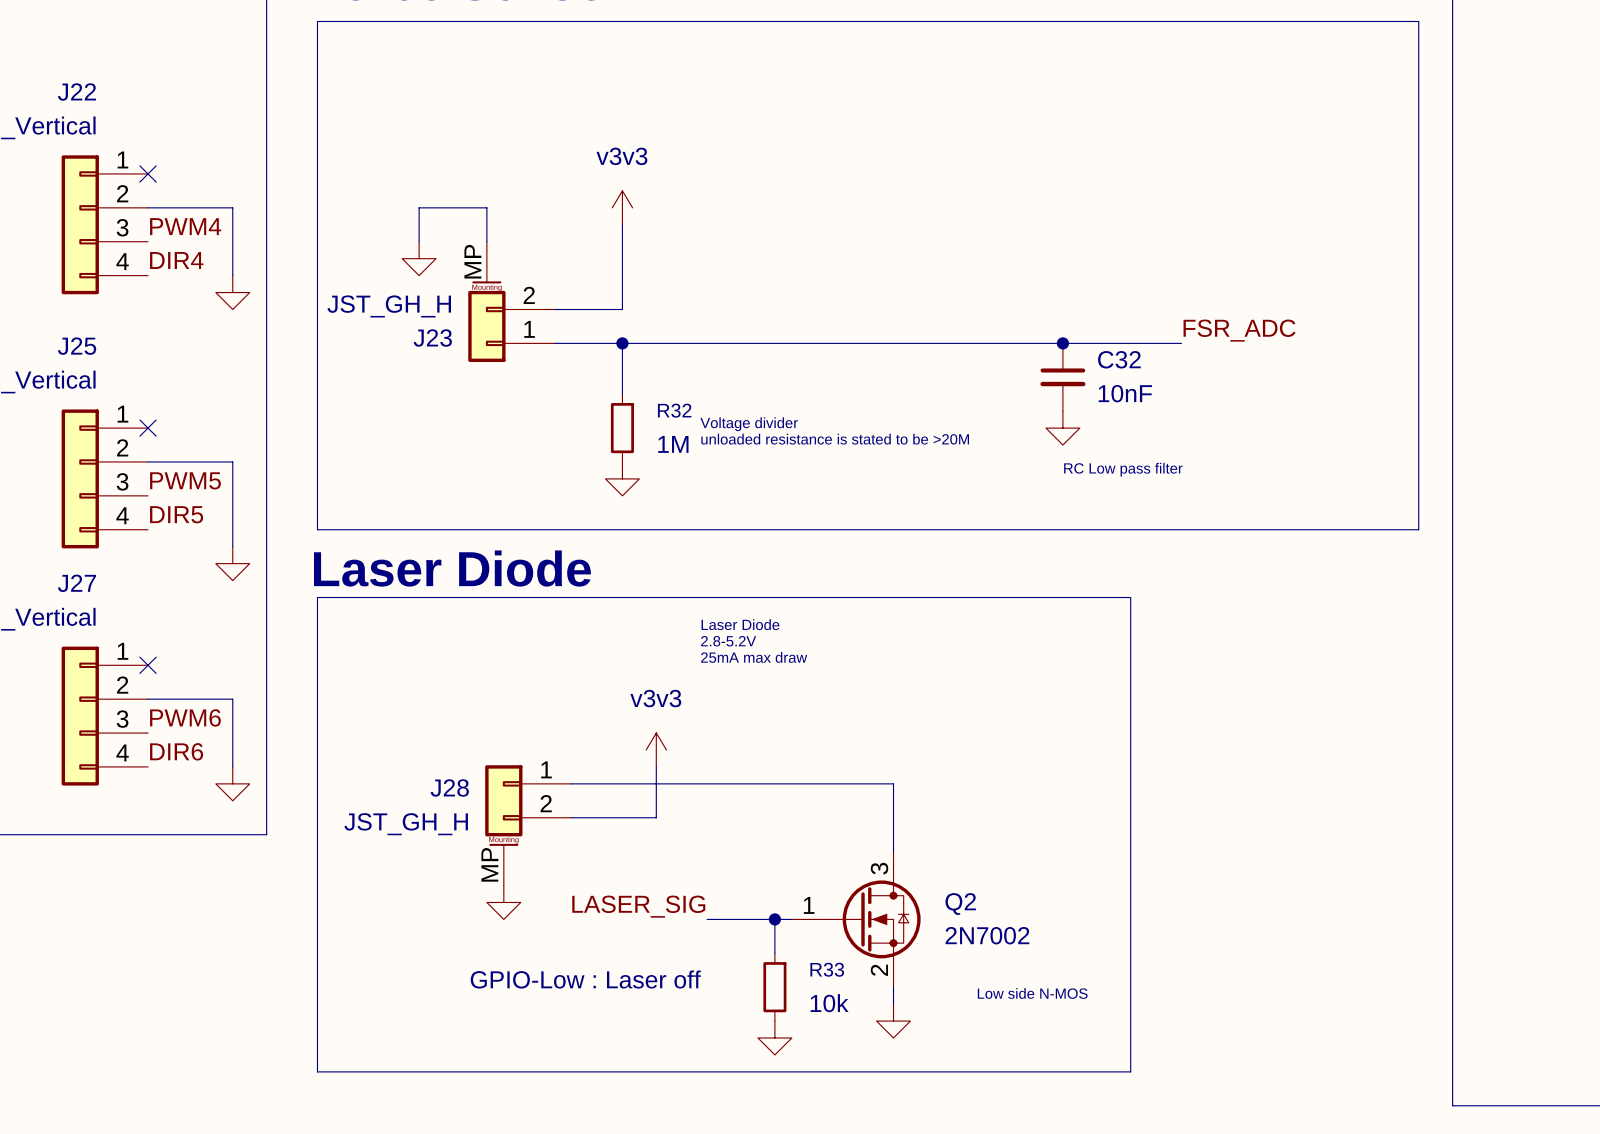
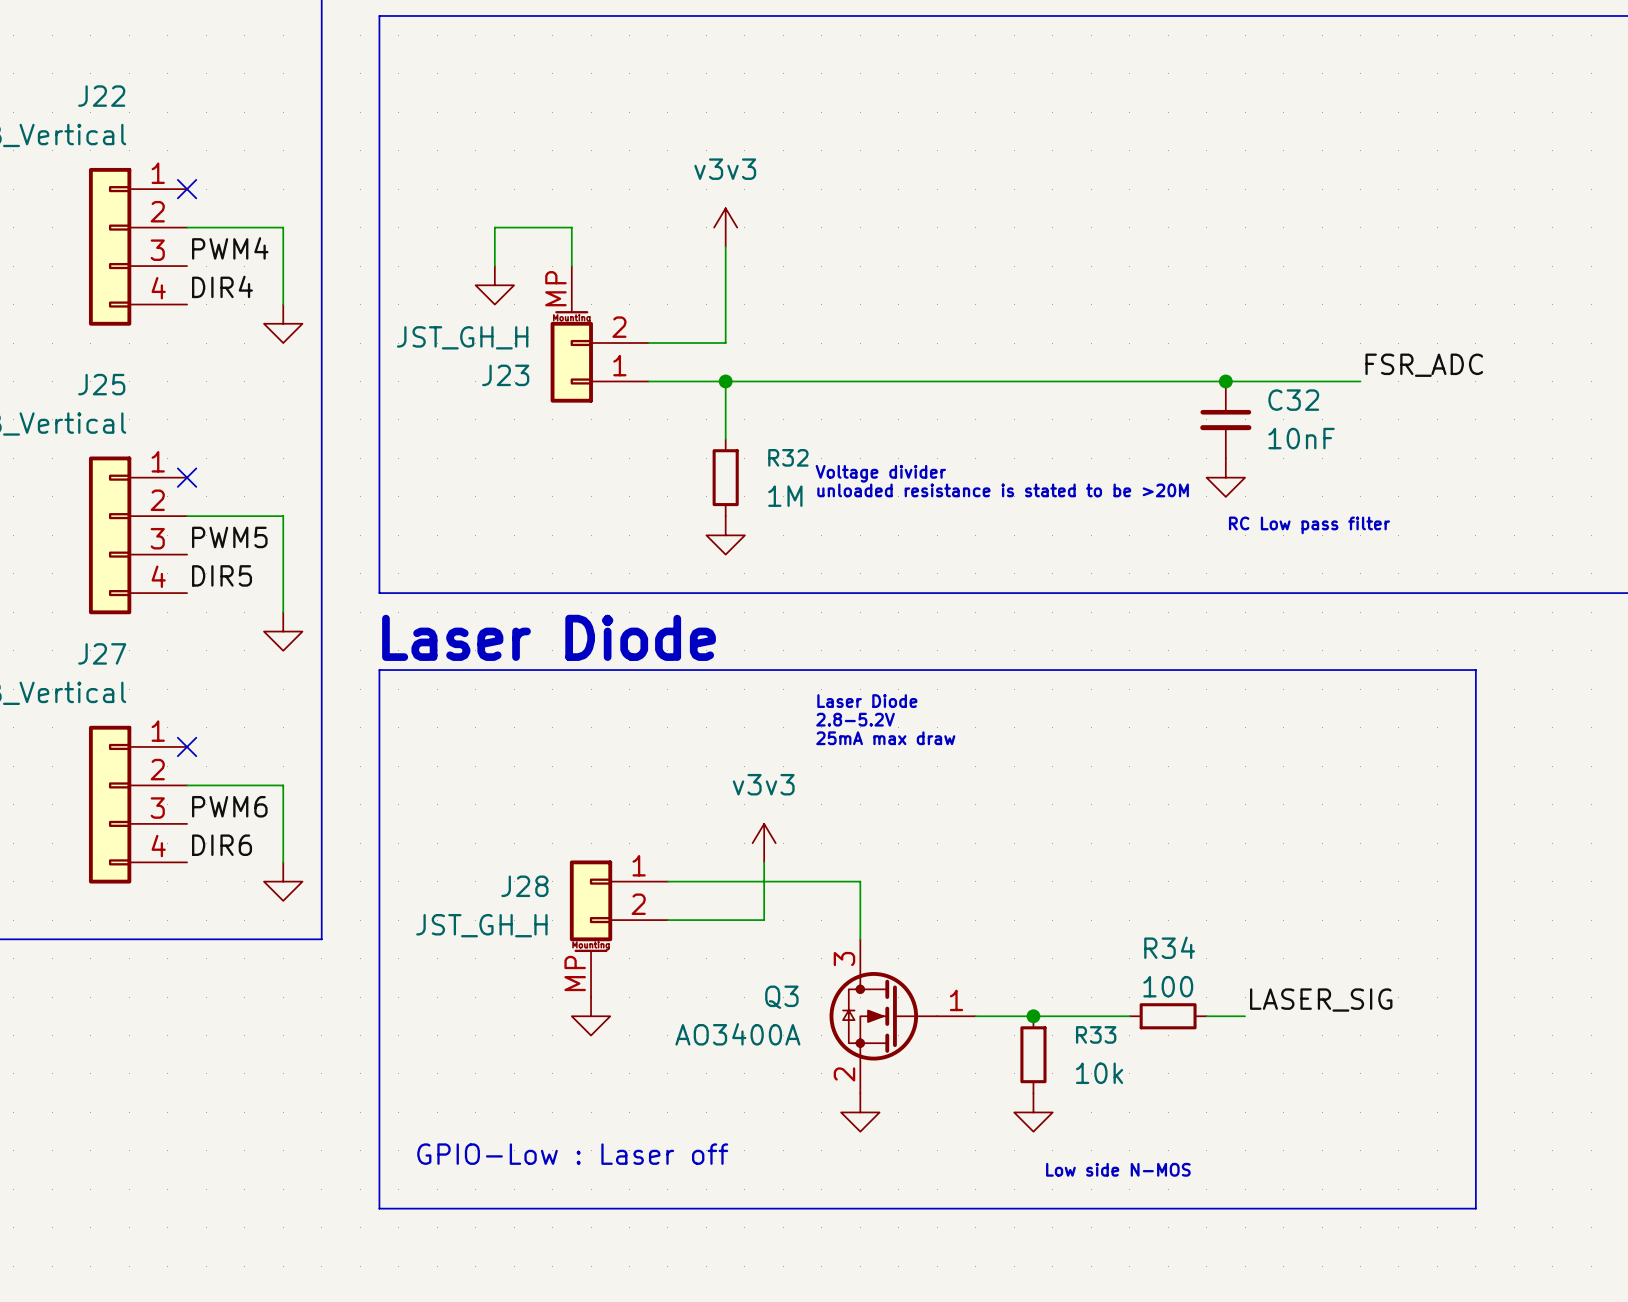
line: (1130, 597) (1130, 1071) -> (1302, 670) (1475, 670) (1475, 1208) (1302, 1208)
wire: (741, 783) (893, 783) (893, 851) -> (860, 881) (860, 939)
label: none -> LASER_SIG (1321, 1000)
Q3: none -> AO3400A (902, 1016)
wire: none -> (975, 1016) (1129, 1016)
junction: none -> (1033, 1016)
R34: none -> 100 (1168, 1016)
wire: none -> (1206, 1016) (1245, 1016)
label: LASER_SIG (638, 906) -> none
wire: (707, 919) (791, 919) -> none
wire: (774, 919) (774, 953) -> none
junction: (774, 919) -> none
Q2: 2N7002 (856, 919) -> none
text position: GPIO-Low : Laser off (585, 979) -> GPIO-Low : Laser off (572, 1154)
R33 position: (774, 987) -> (1033, 1054)
wire: (893, 987) (893, 1004) -> none
text position: Low side N-MOS (1032, 993) -> Low side N-MOS (1118, 1169)
power symbol position: (893, 1021) -> (1033, 1112)
power symbol position: (774, 1038) -> (860, 1112)

